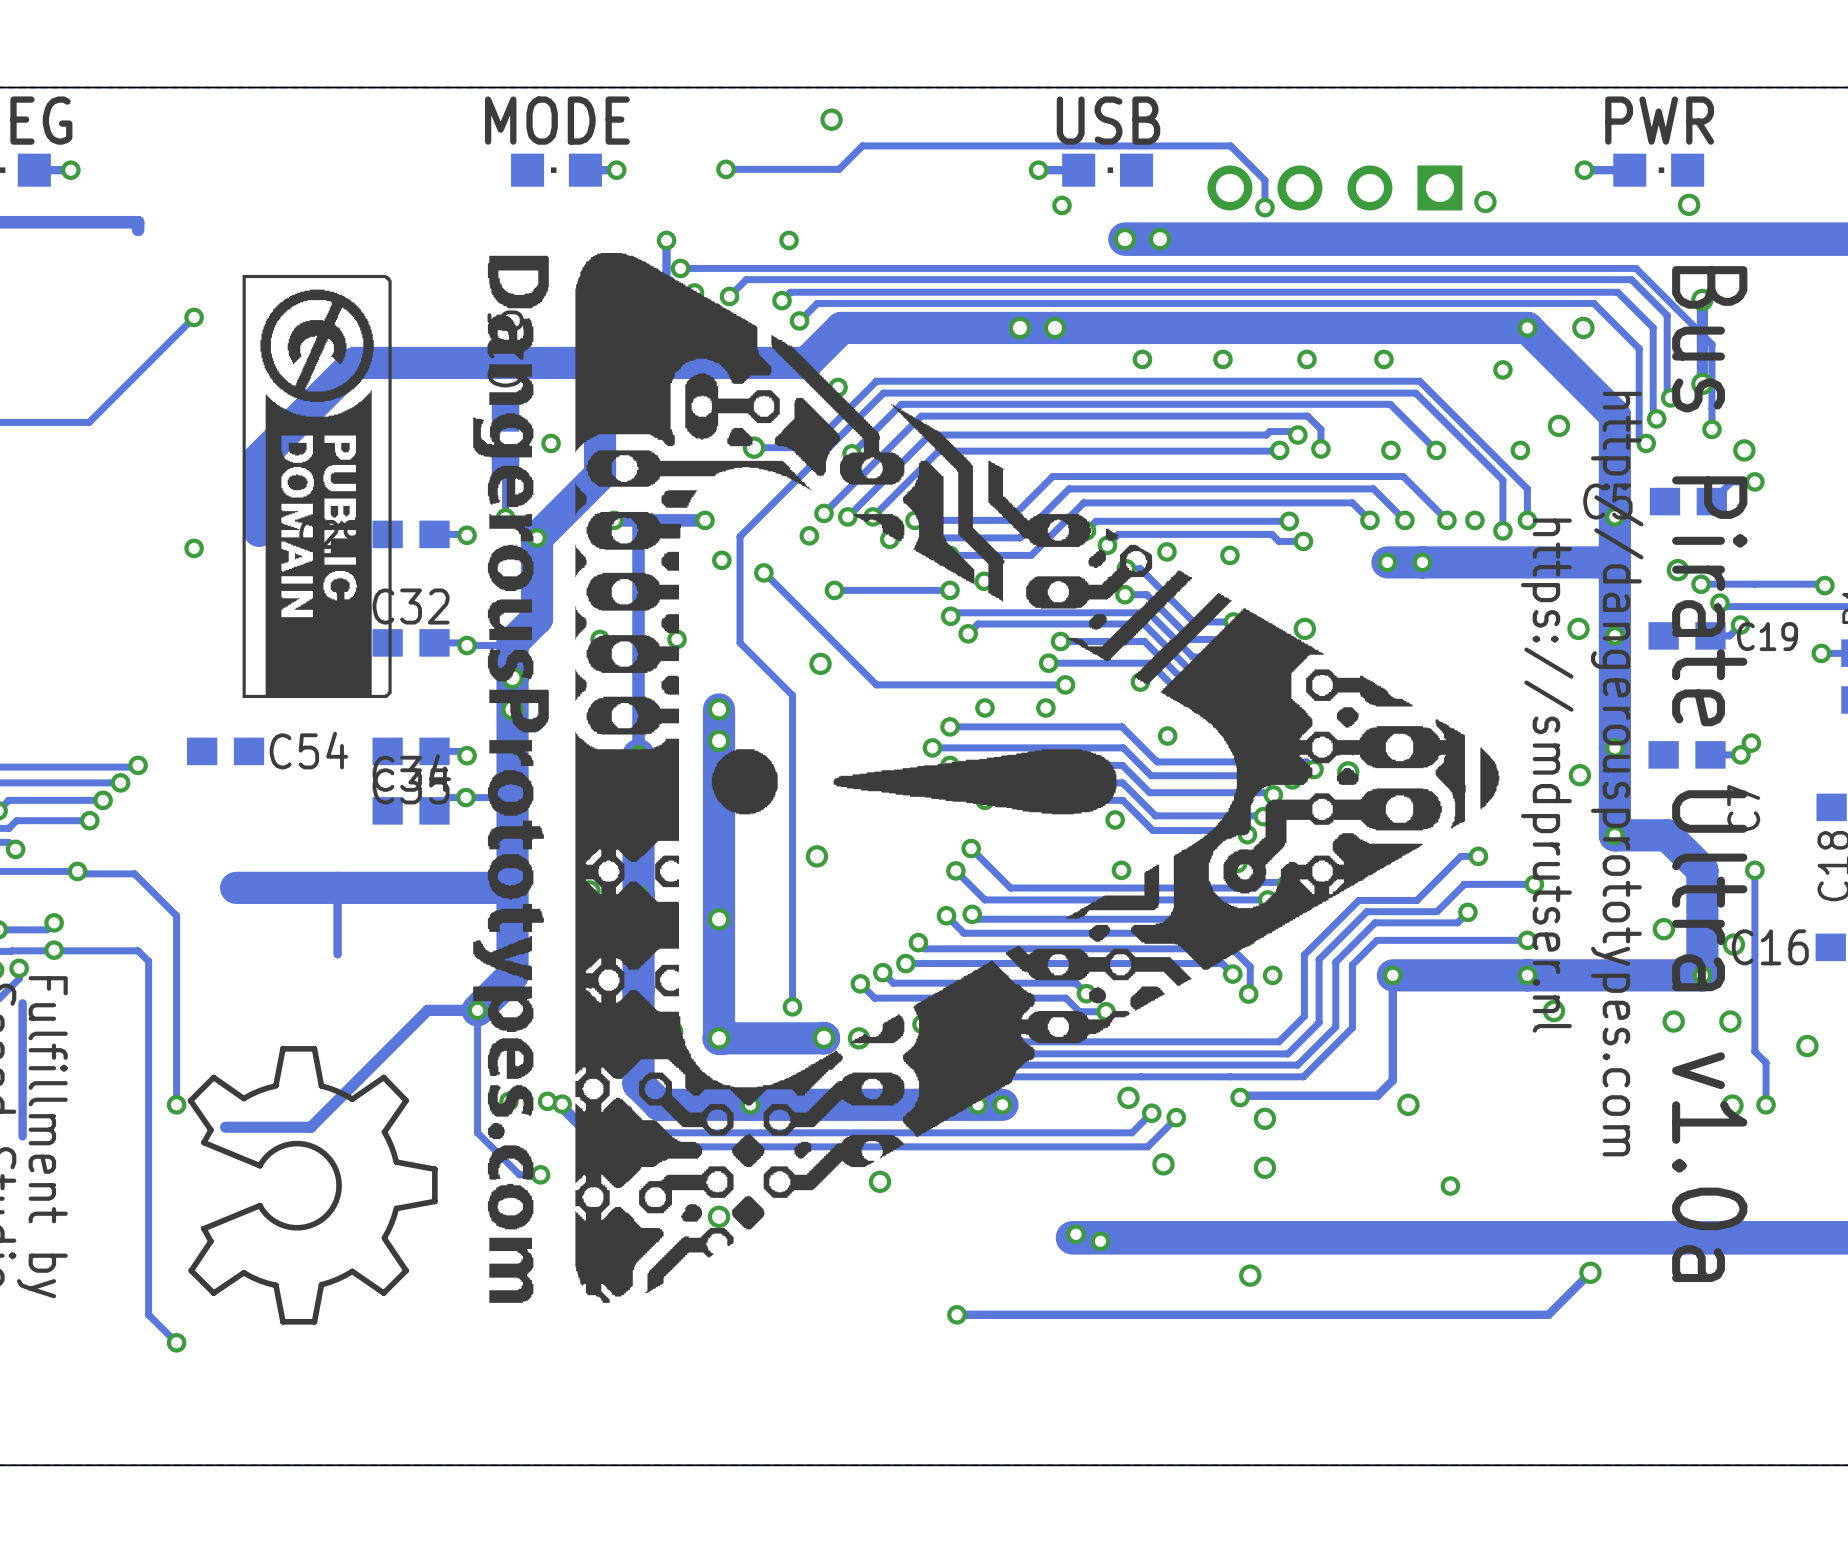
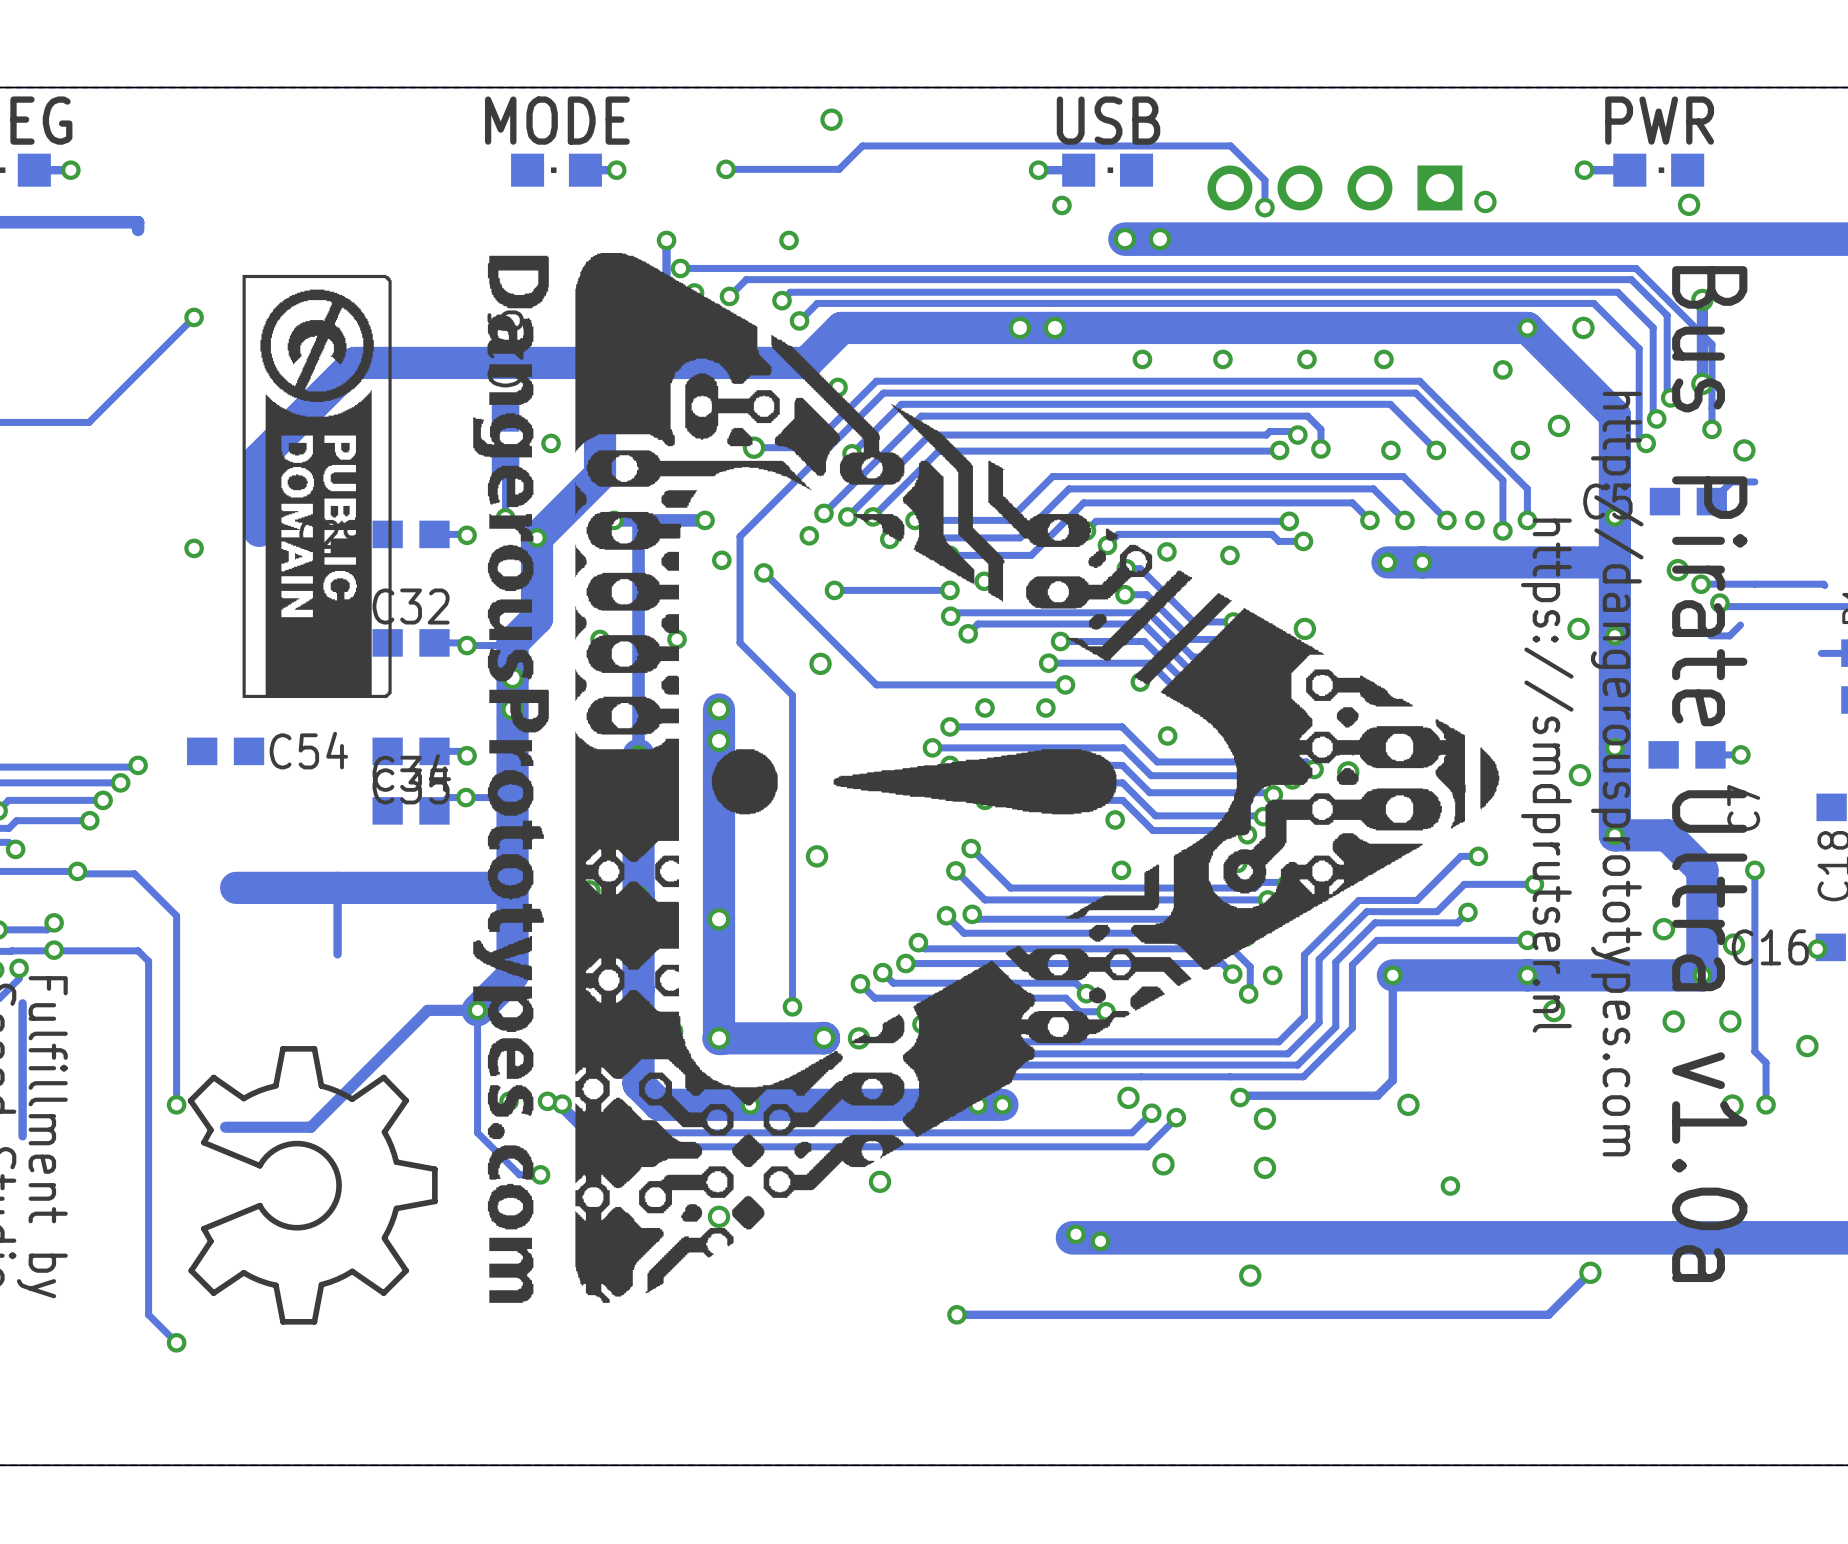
via: (1754, 481) -> none
via: (1824, 585) -> none
via: (1740, 625) -> none
C19: (1687, 635) -> none
via: (1821, 653) -> none
via: (1751, 743) -> none
via: none -> (1817, 949)

